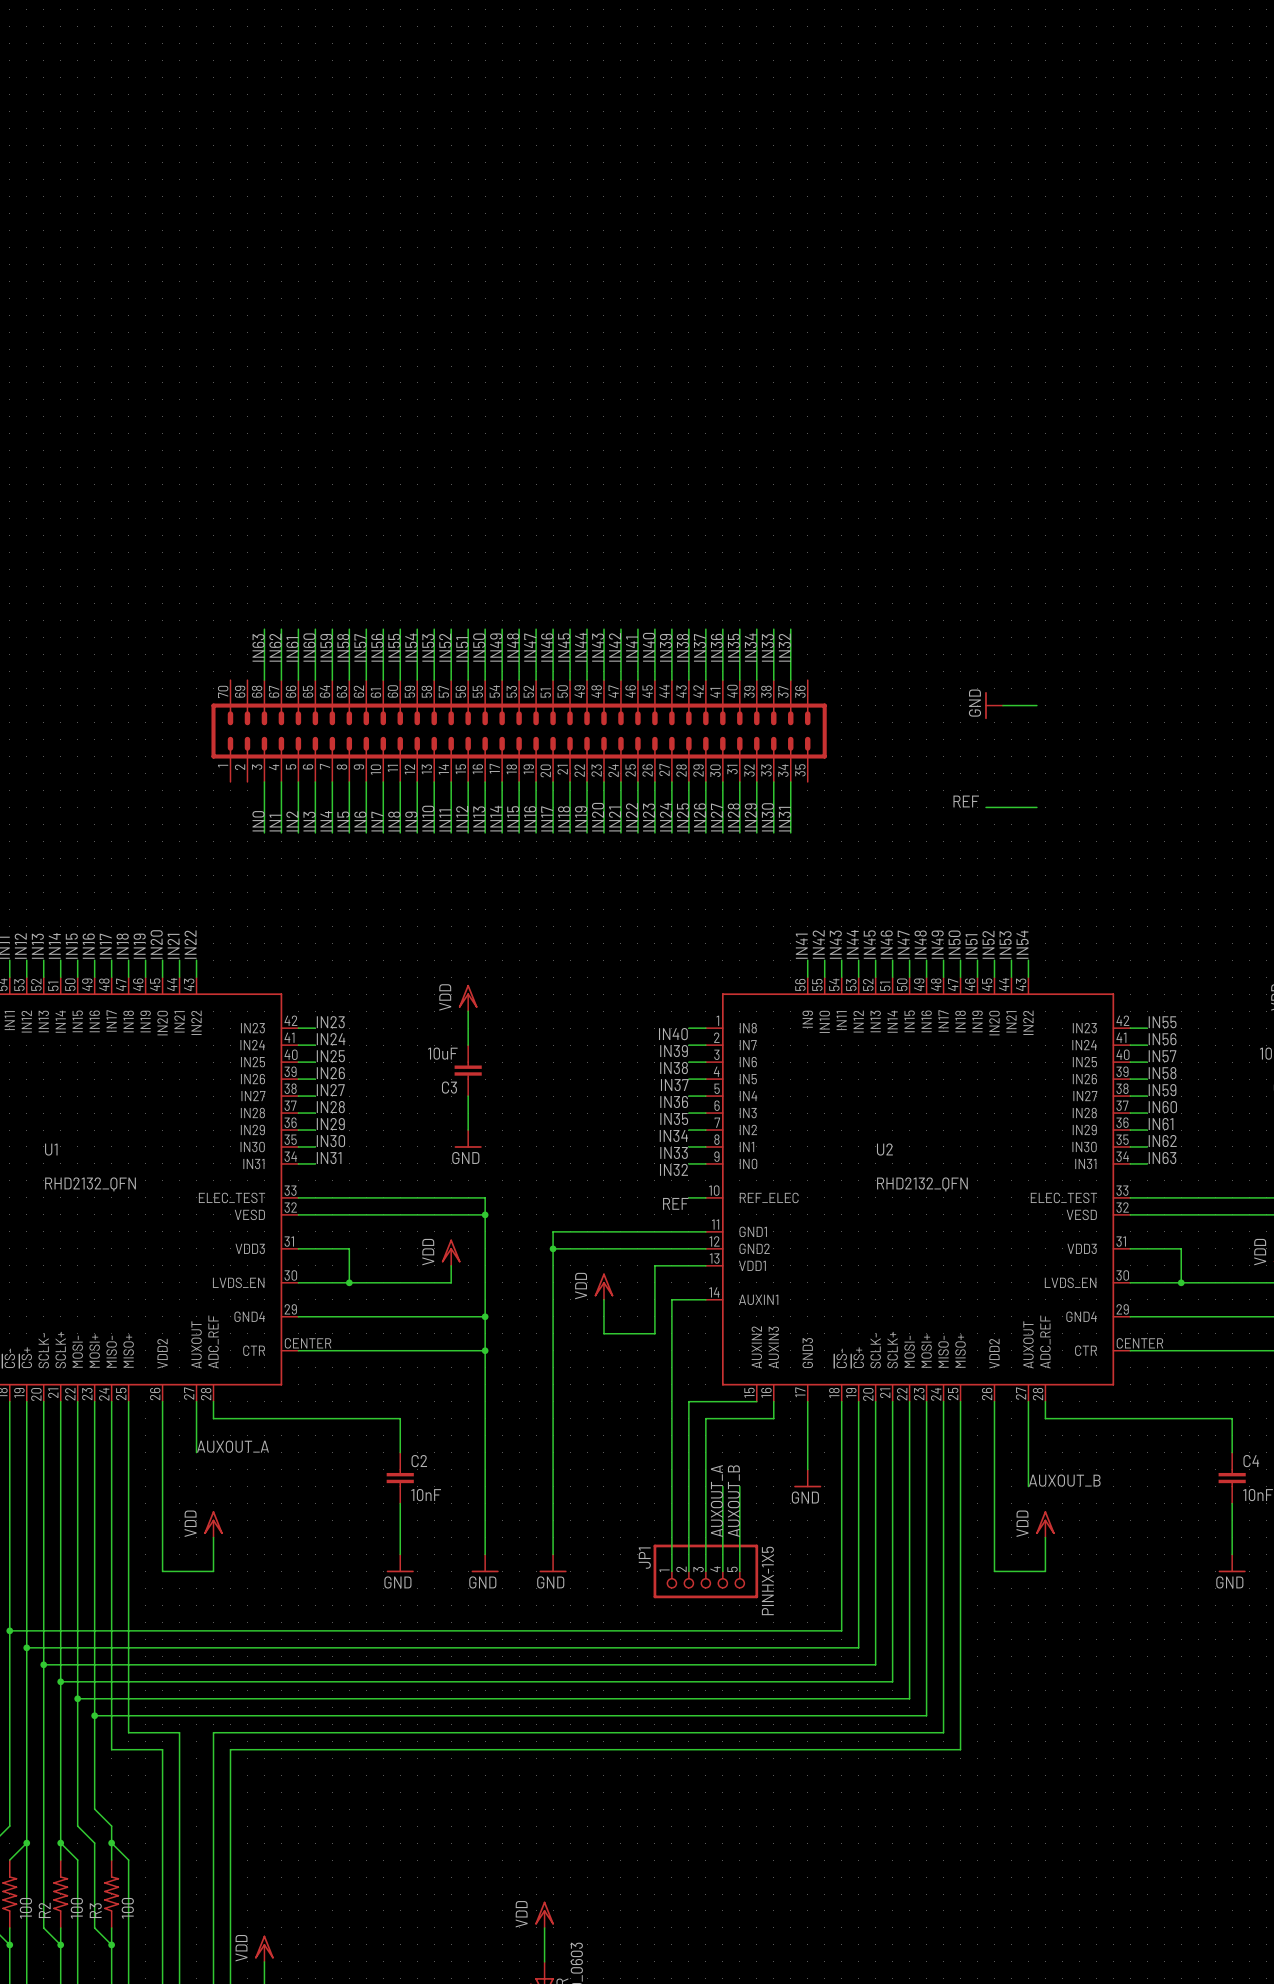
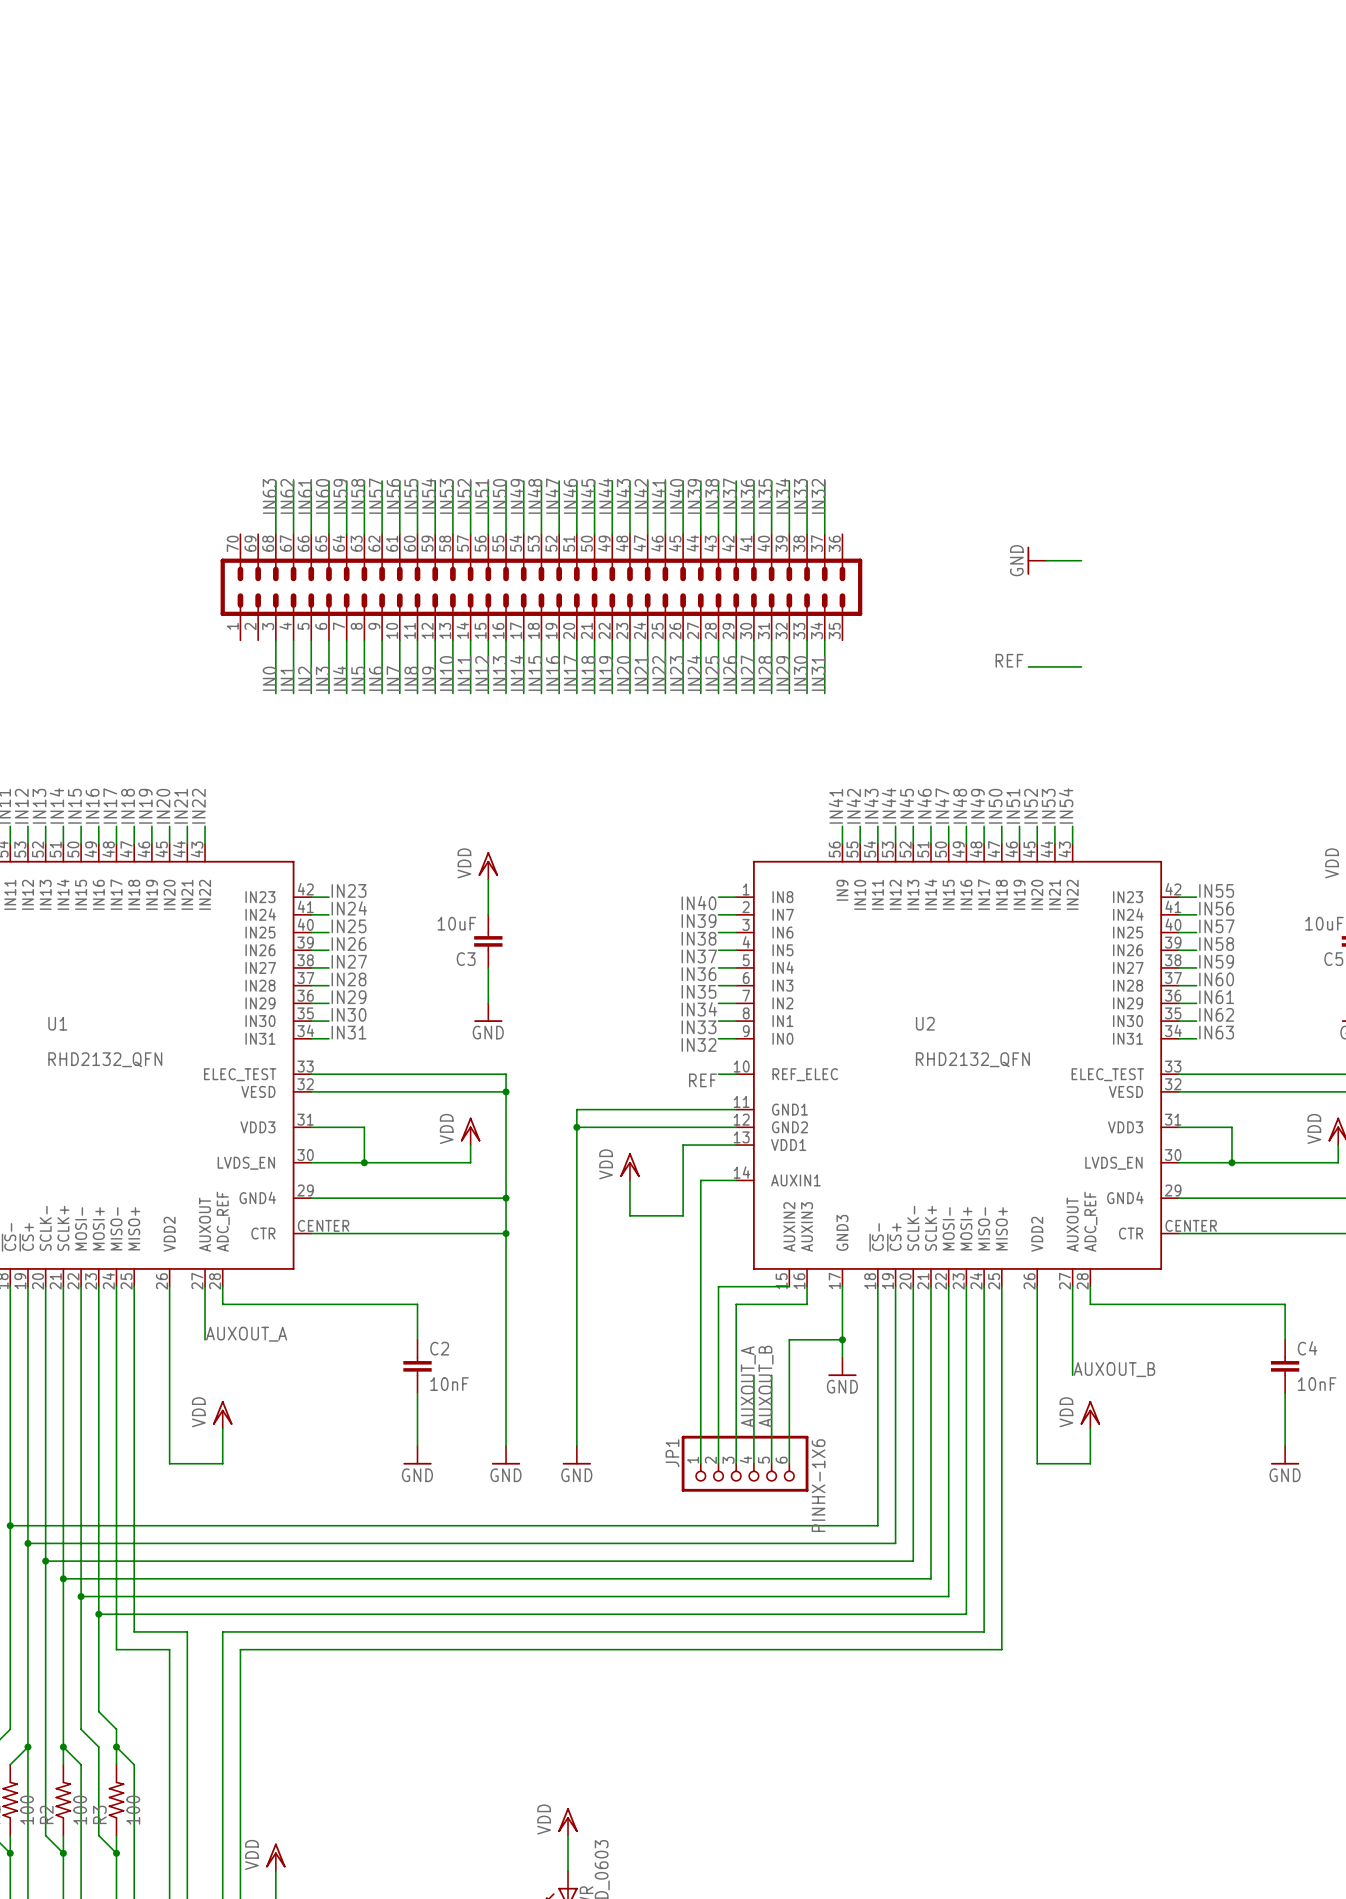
wire: none -> (842, 1339) (789, 1339) (789, 1463)
junction: none -> (842, 1339)
JP1 symbol: [653, 1544, 759, 1599] -> [681, 1435, 809, 1492]
JP1 value: PINHX-1X5 (767, 1580) -> PINHX-1X6 (818, 1485)

